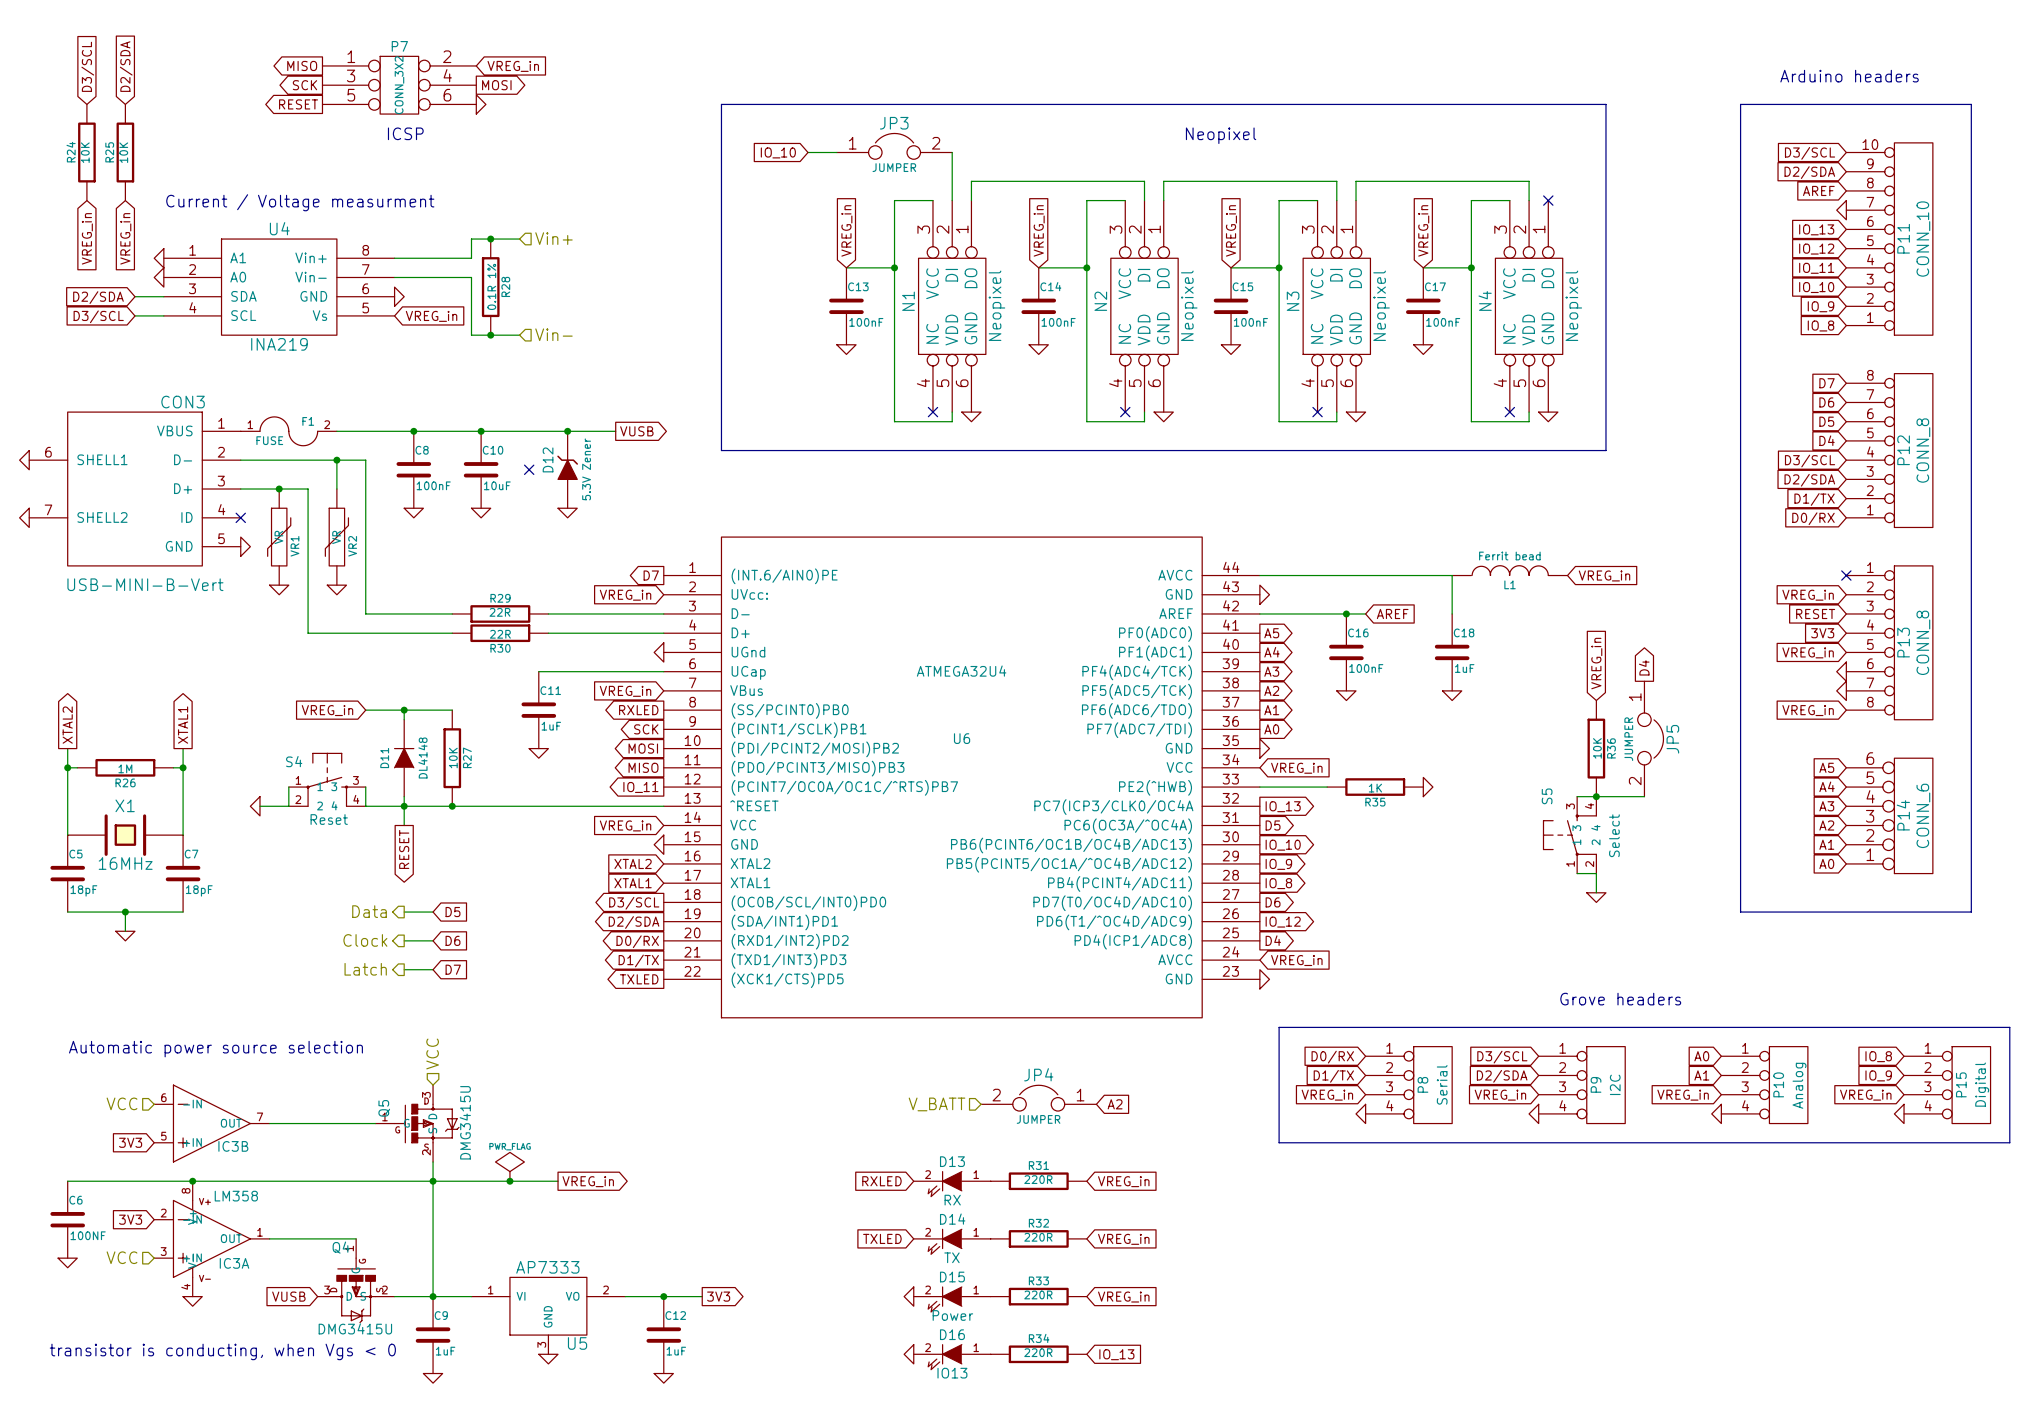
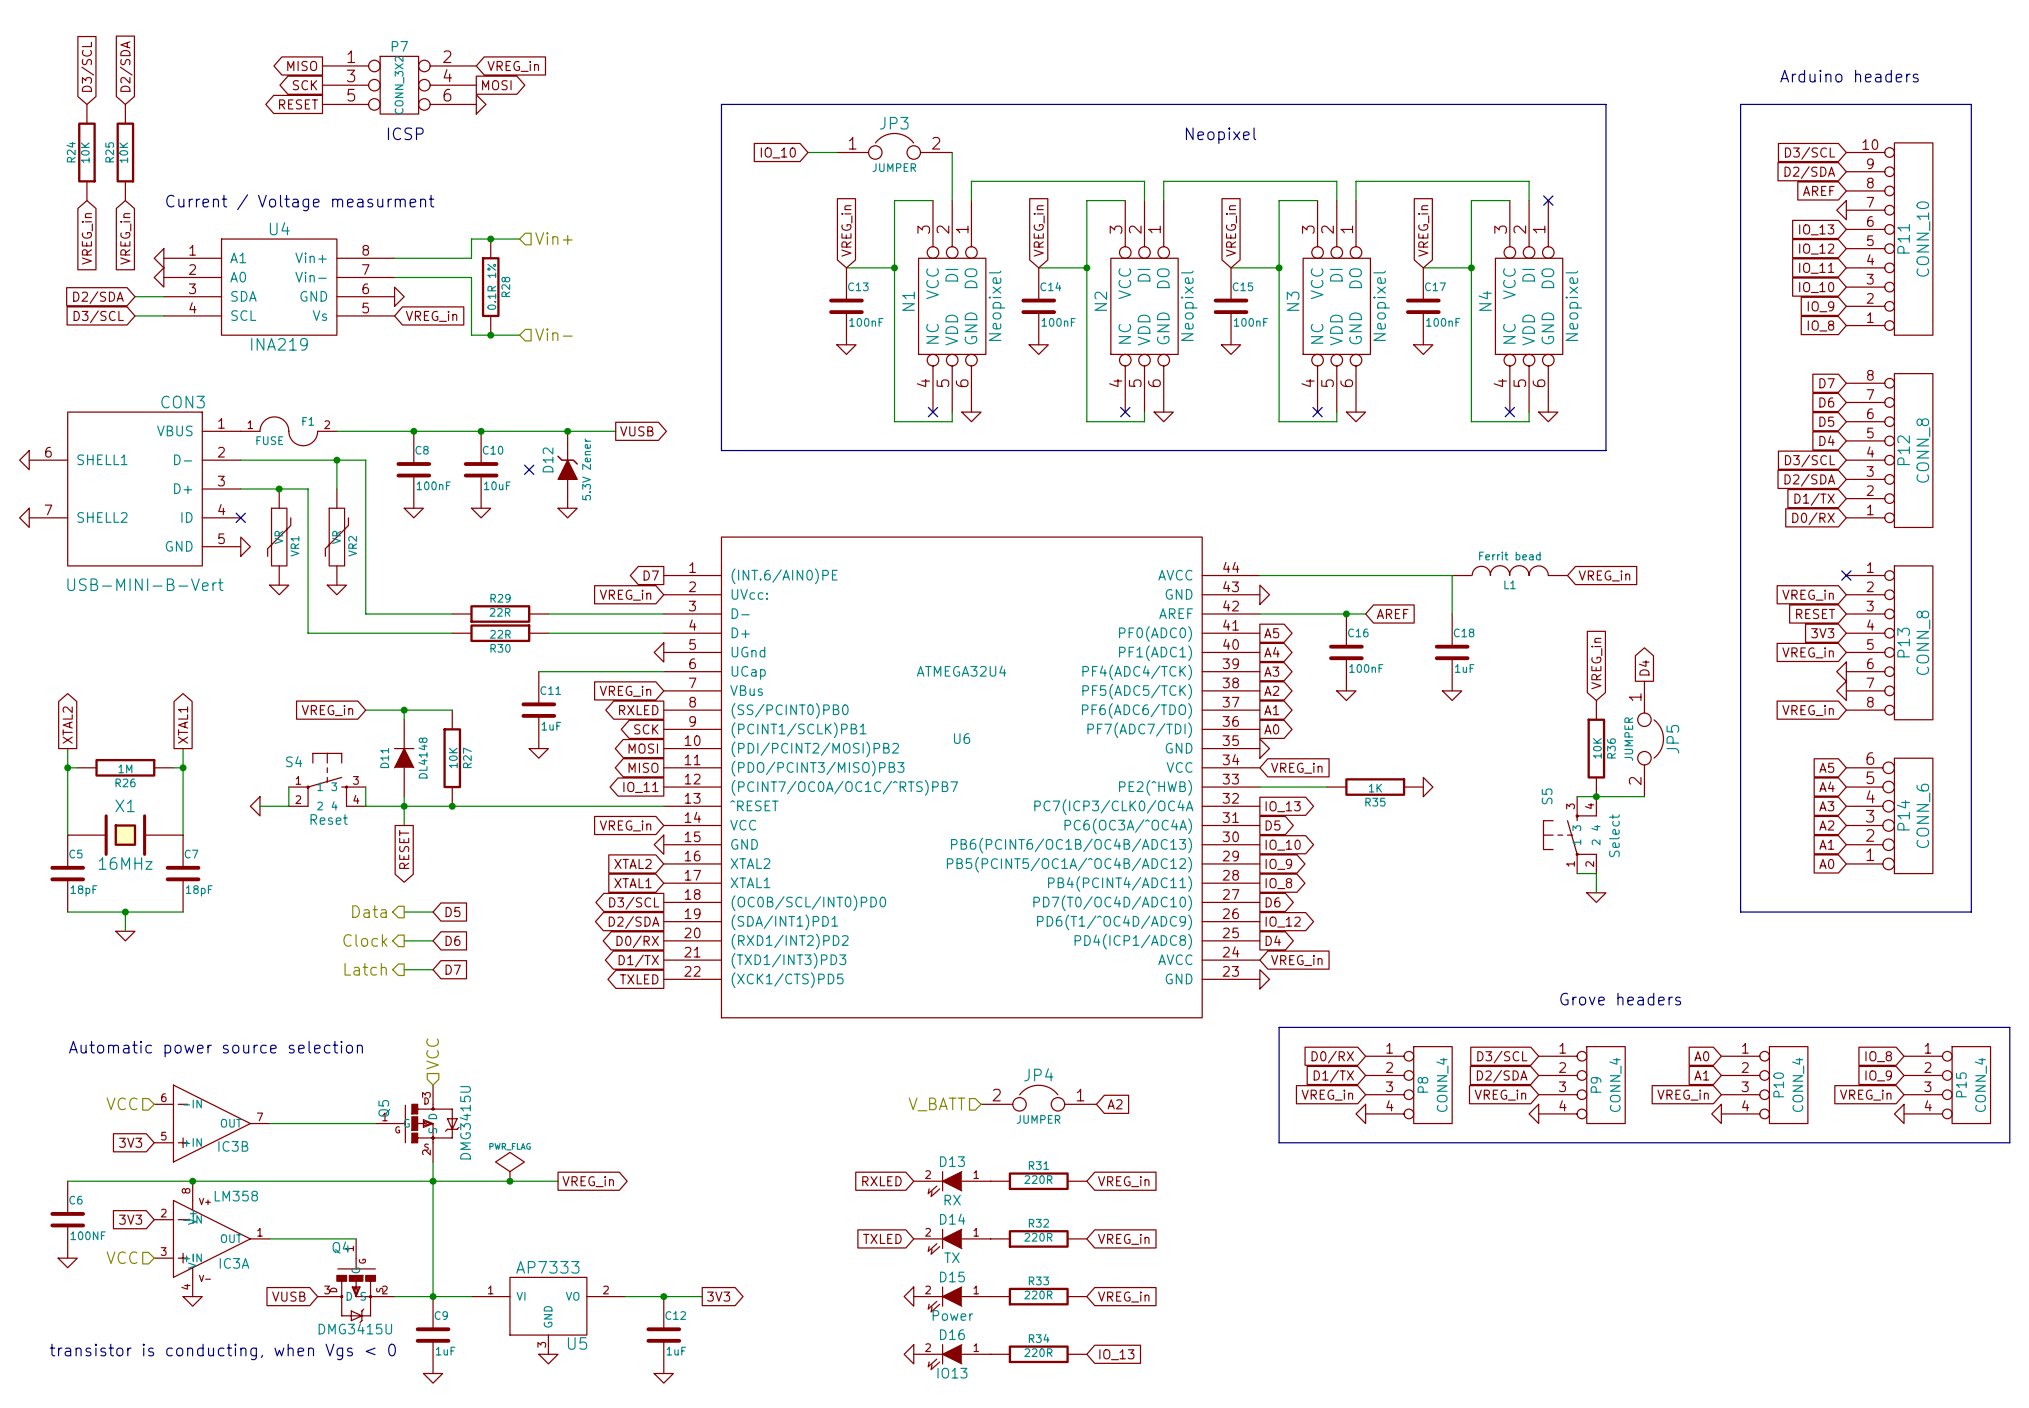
P8 value: Serial (1442, 1084) -> CONN_4 (1442, 1084)
P9 value: I2C (1615, 1084) -> CONN_4 (1615, 1084)
P15 value: Digital (1982, 1084) -> CONN_4 (1980, 1084)
P10 value: Analog (1799, 1085) -> CONN_4 (1798, 1084)

